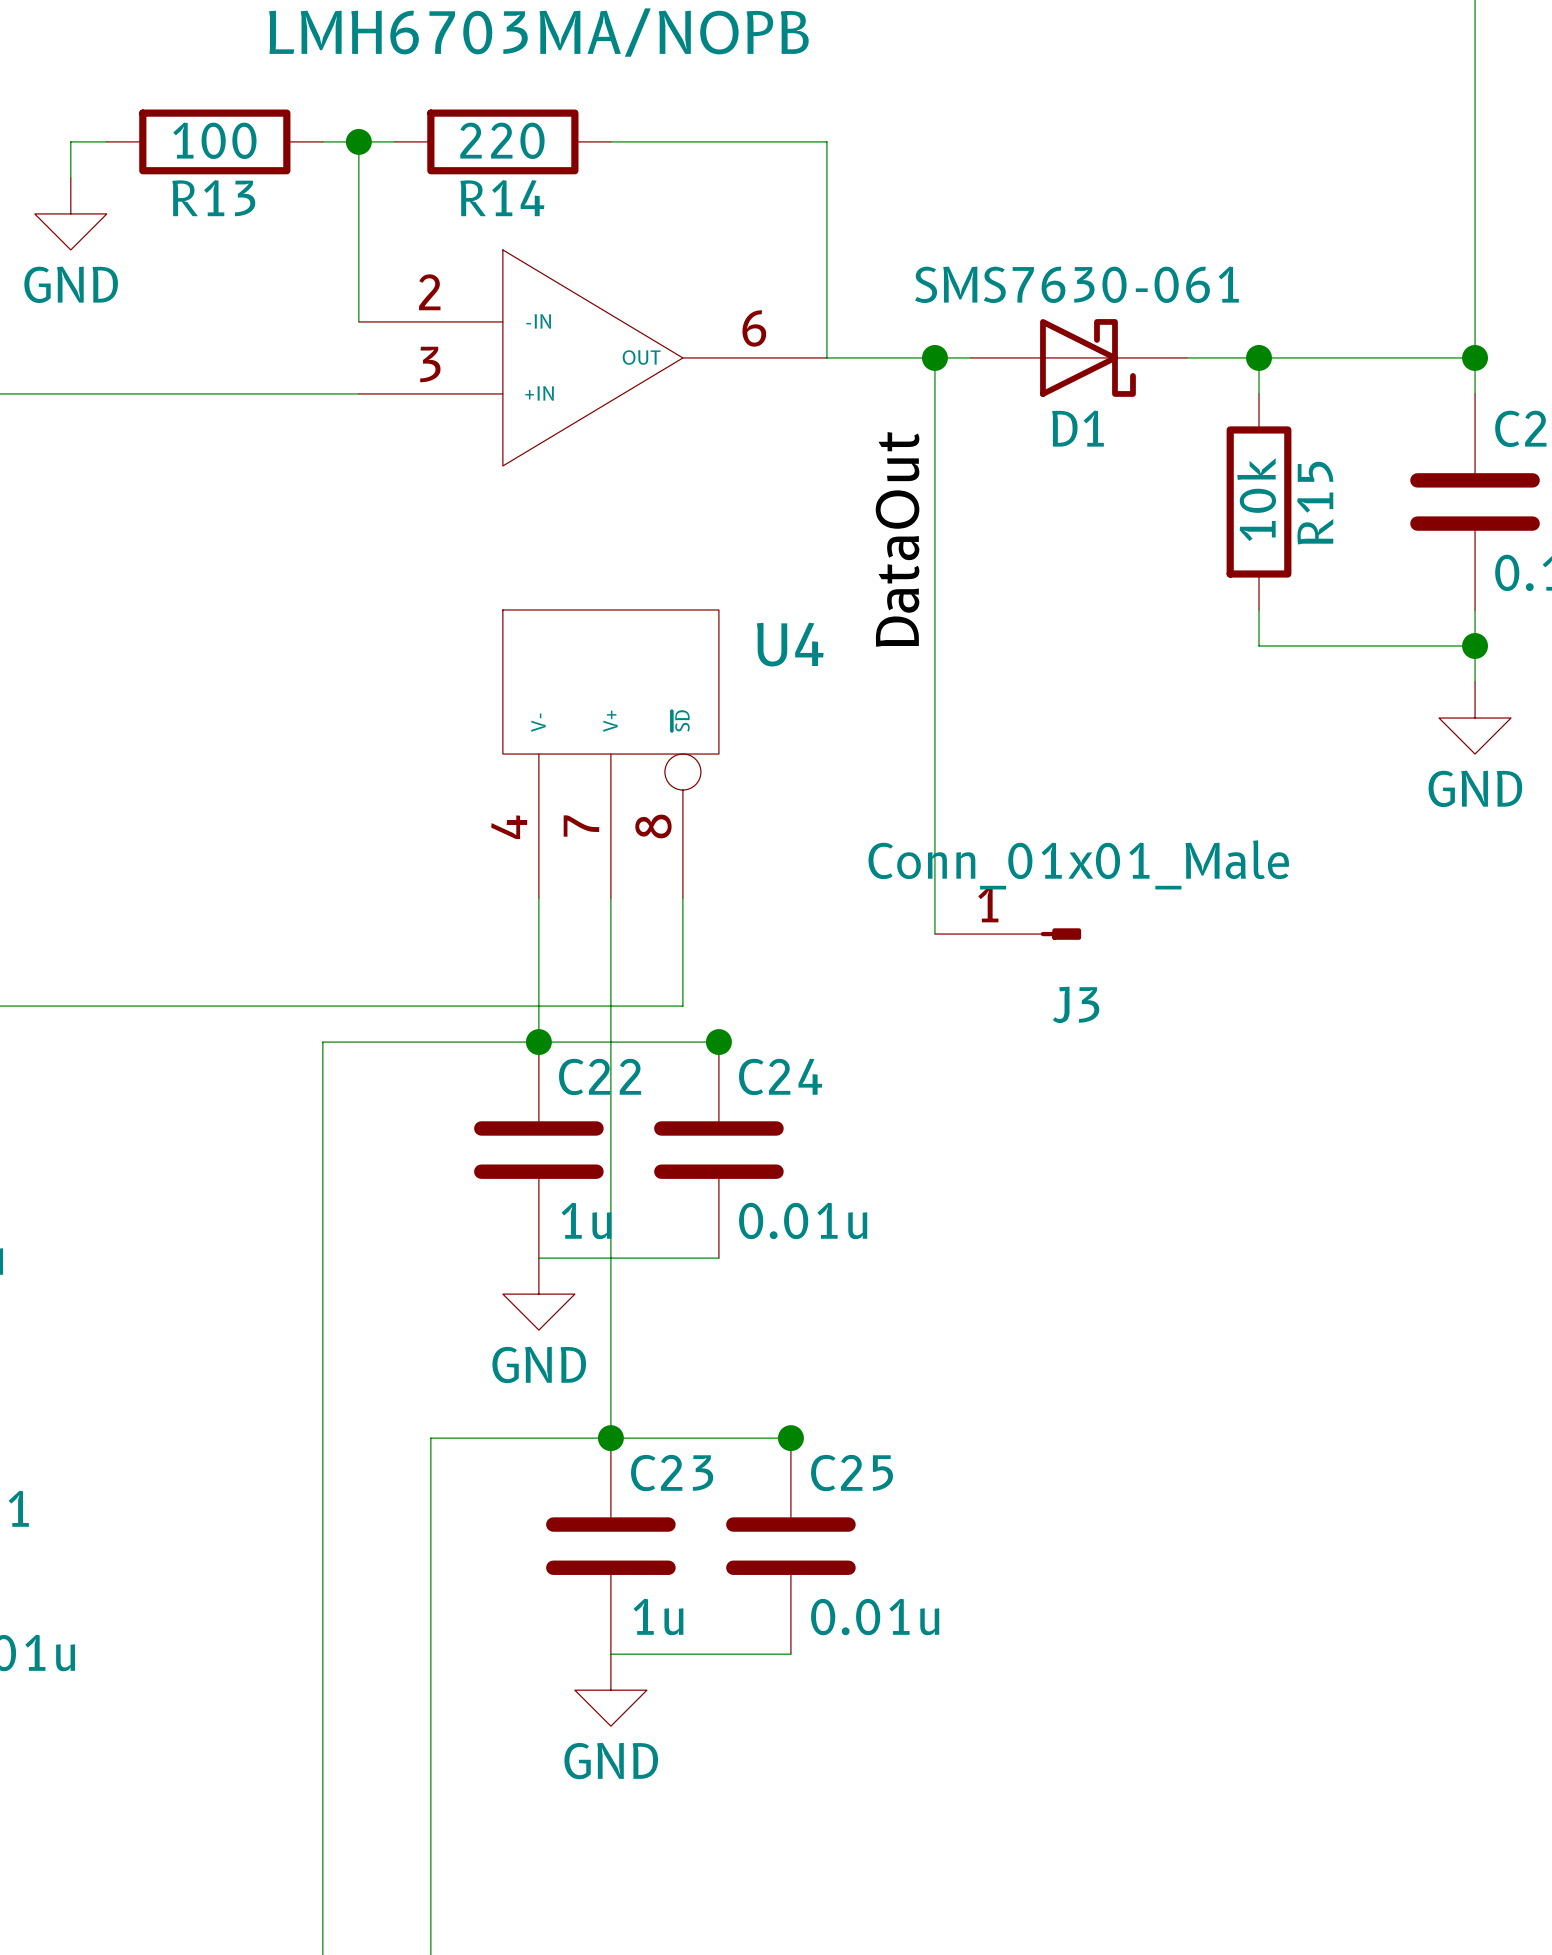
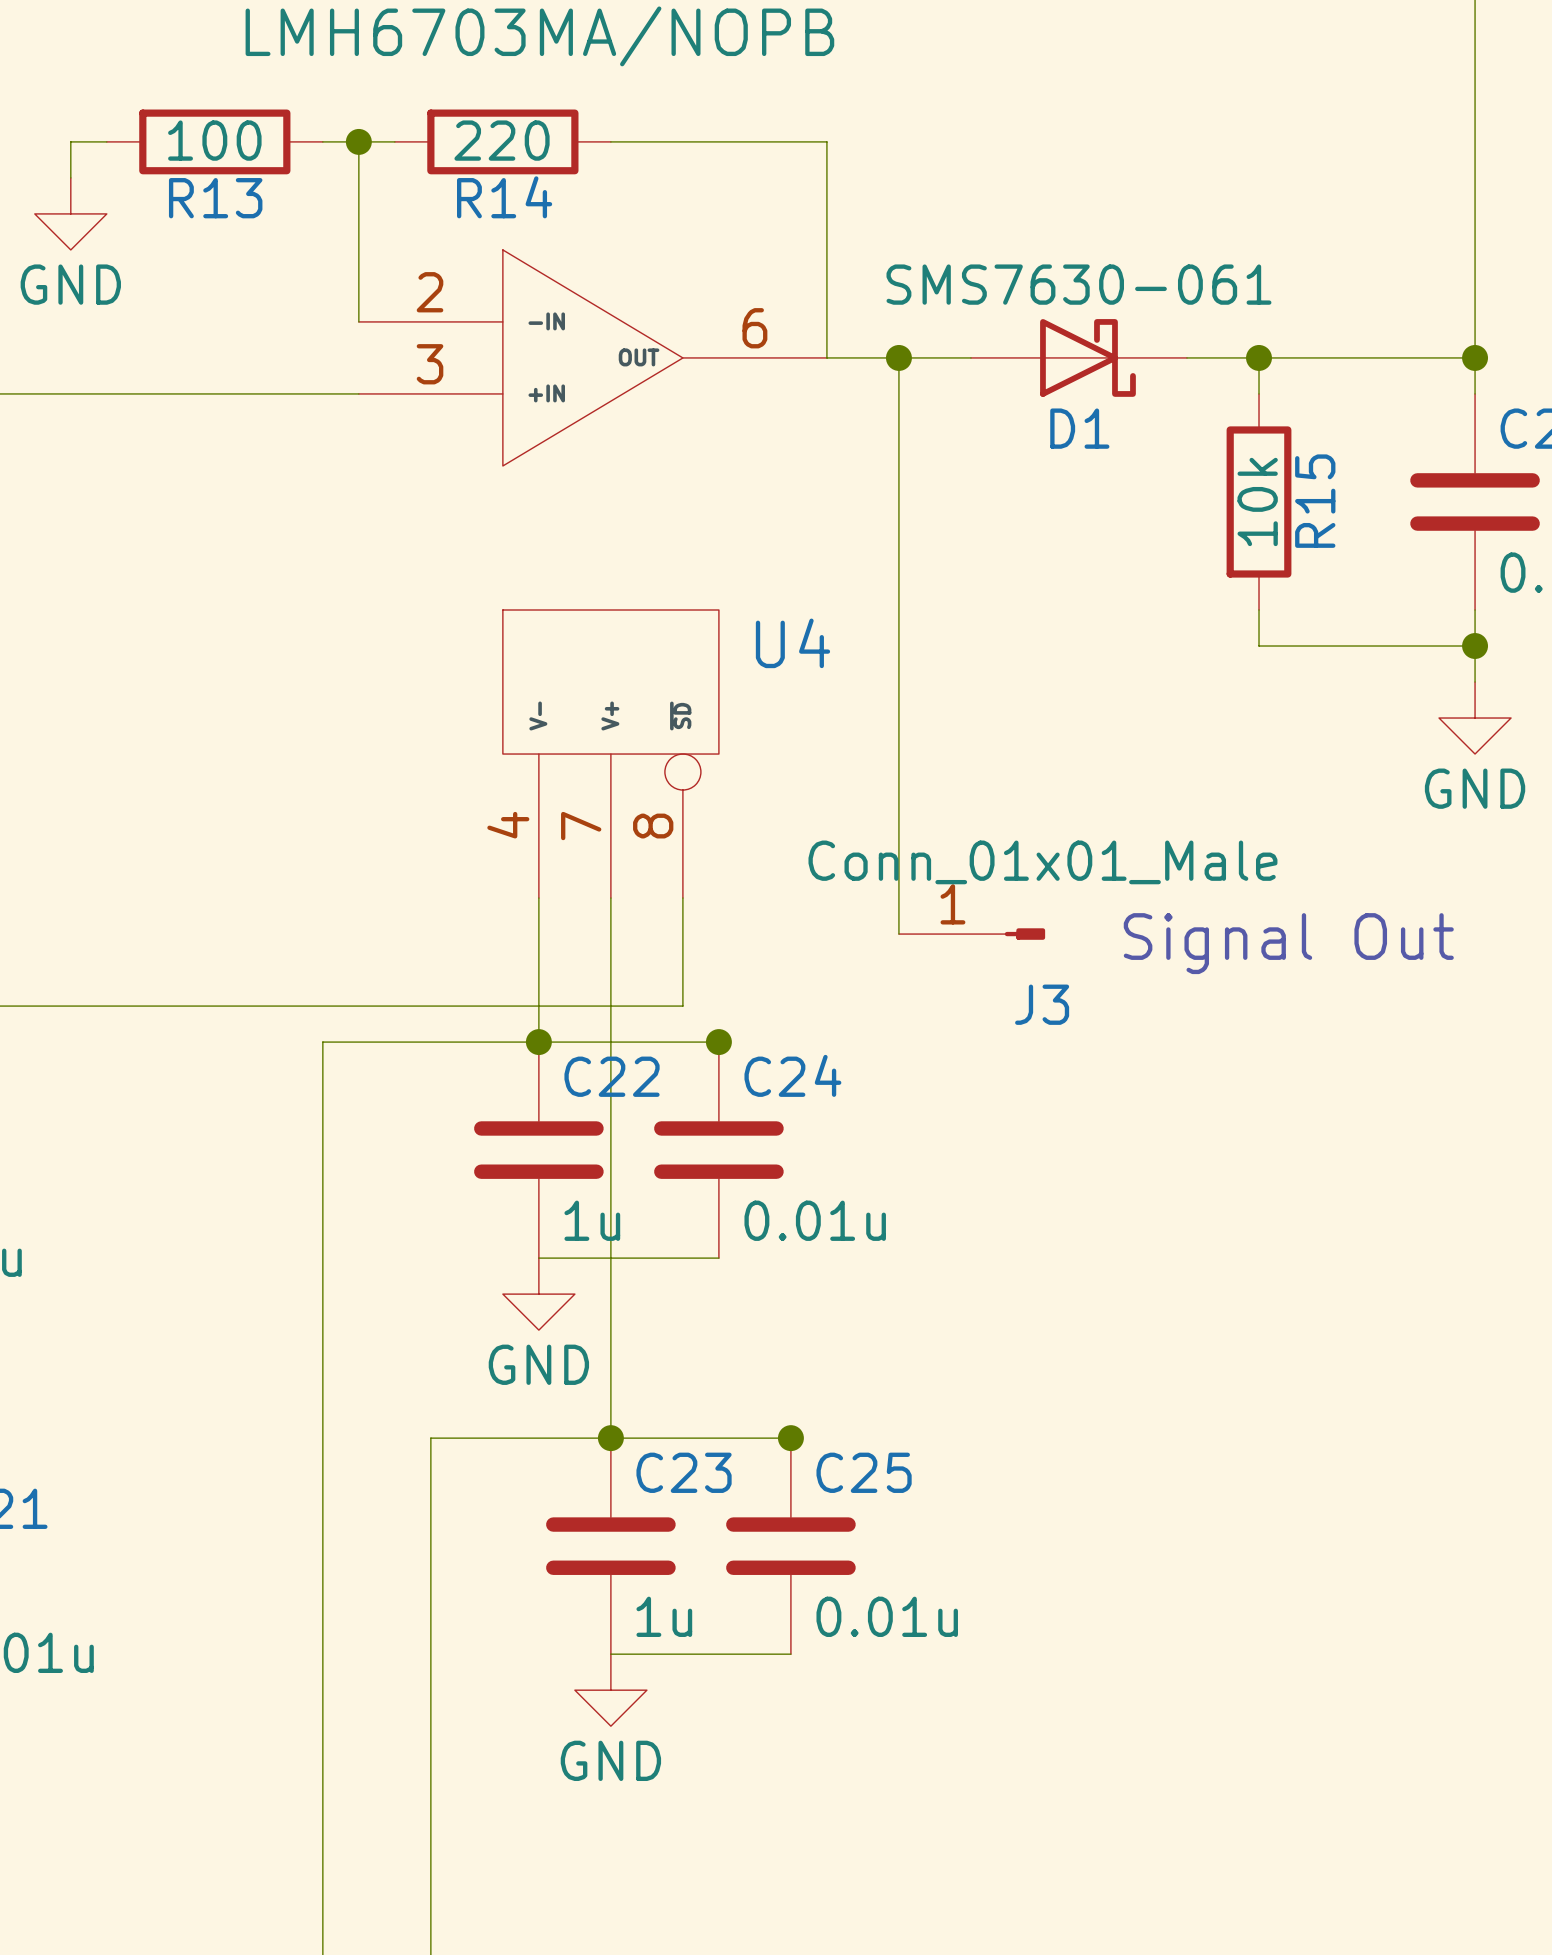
wire: (934, 357) (934, 934) -> (898, 357) (898, 934)
junction position: (934, 357) -> (898, 357)
label: DataOut (897, 539) -> none
J3 position: (1008, 934) -> (972, 934)
text: none -> Signal Out (1288, 943)

